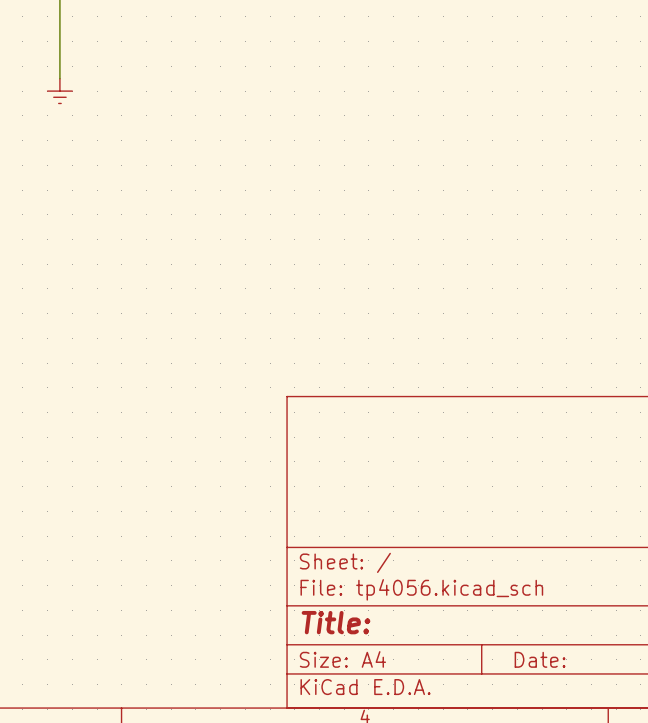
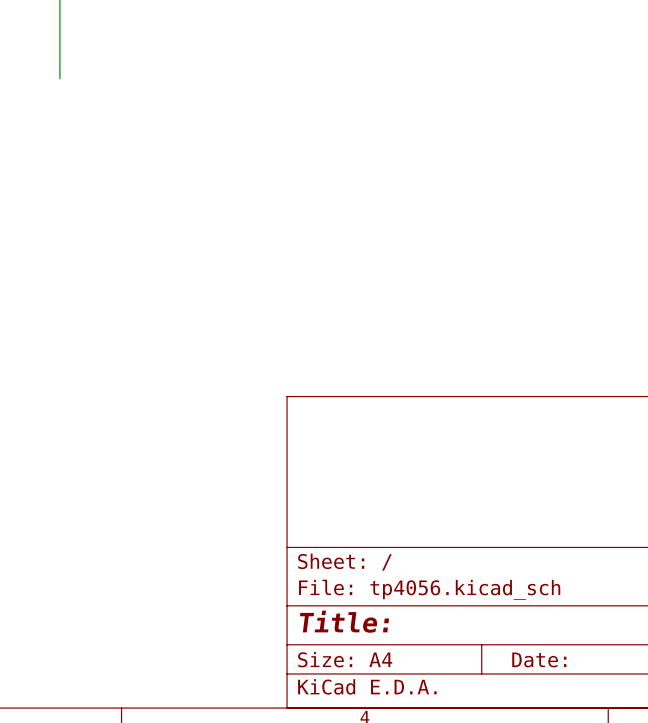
power symbol: (59, 91) -> none

